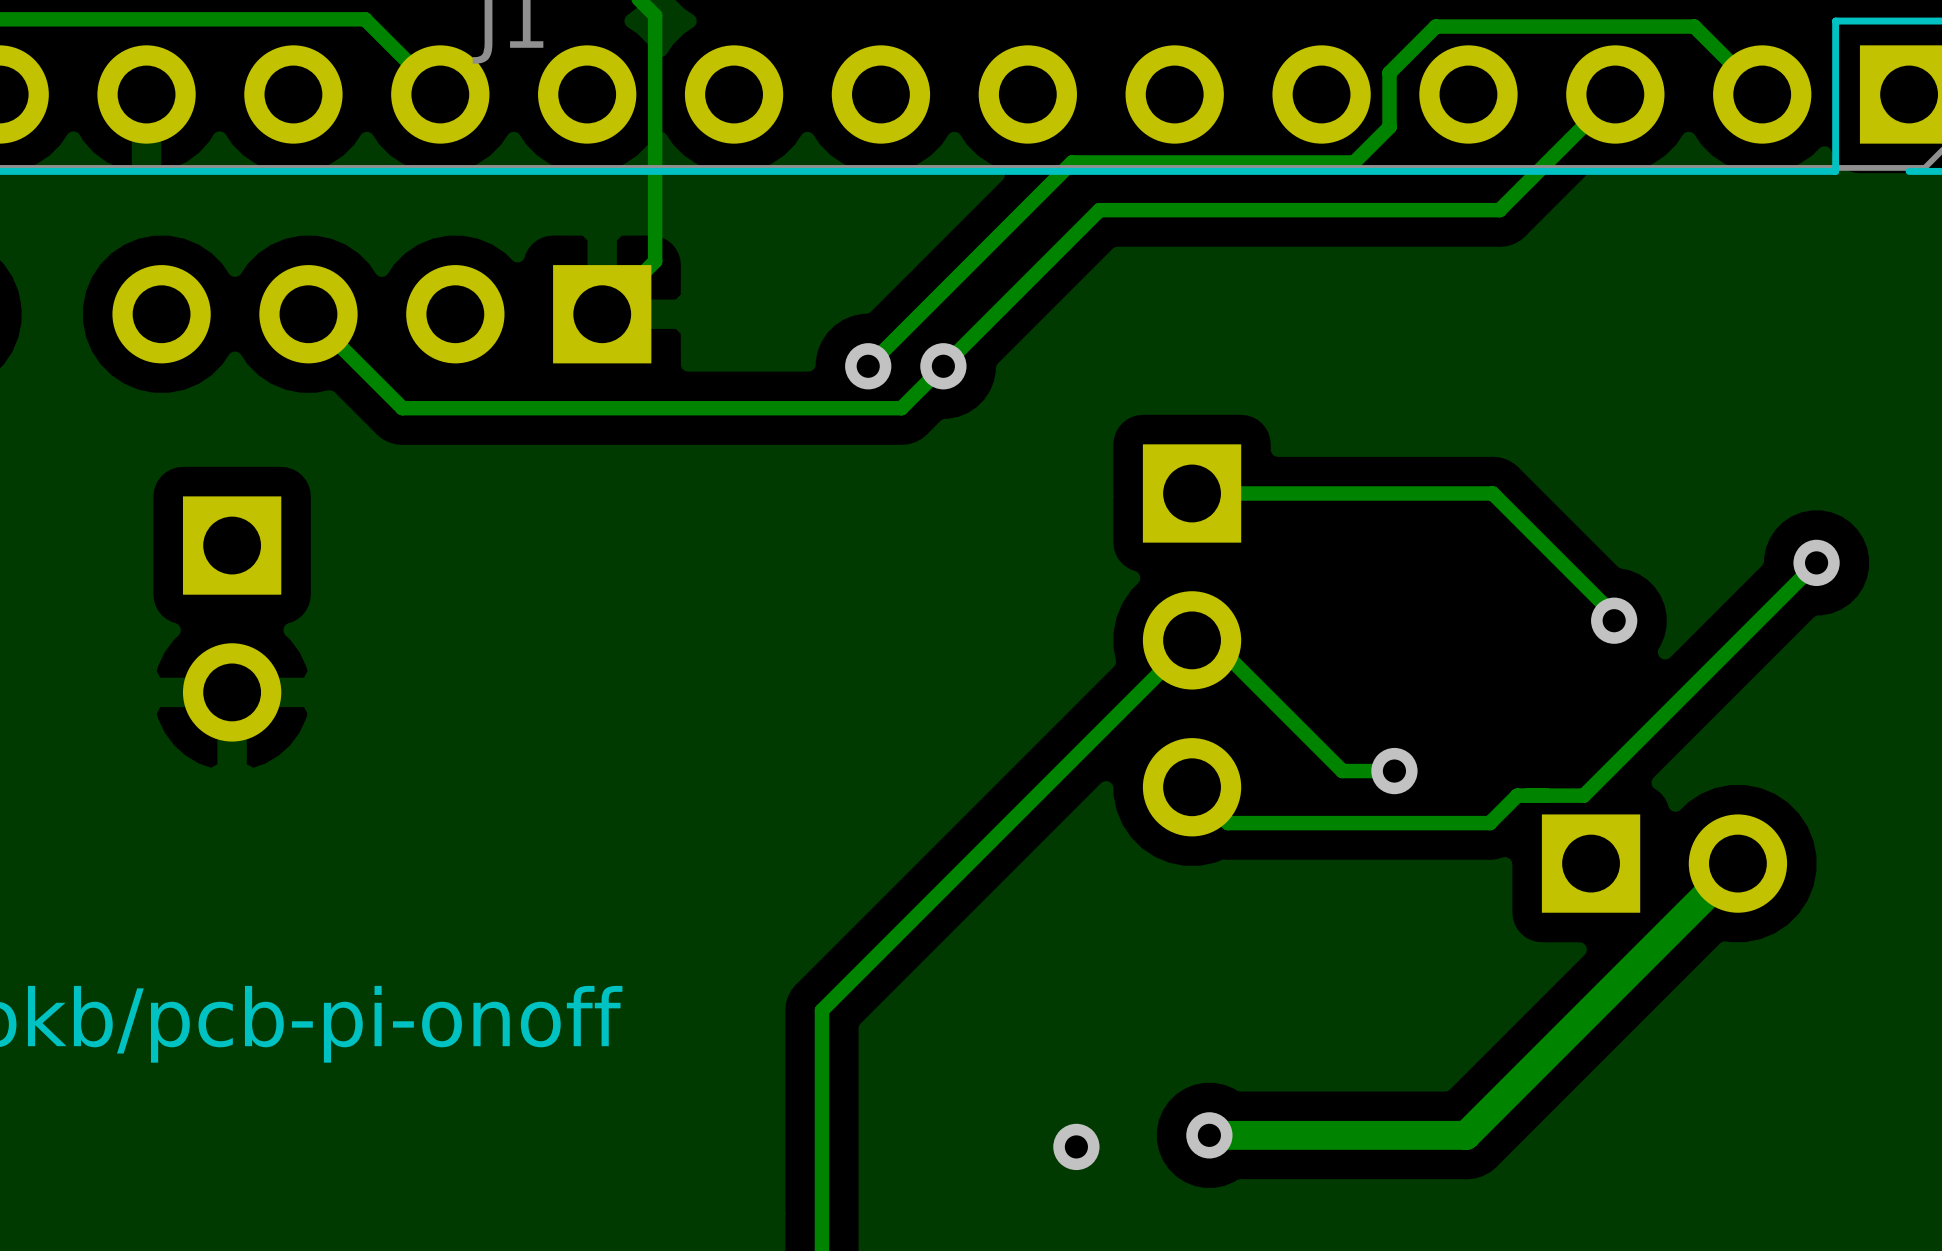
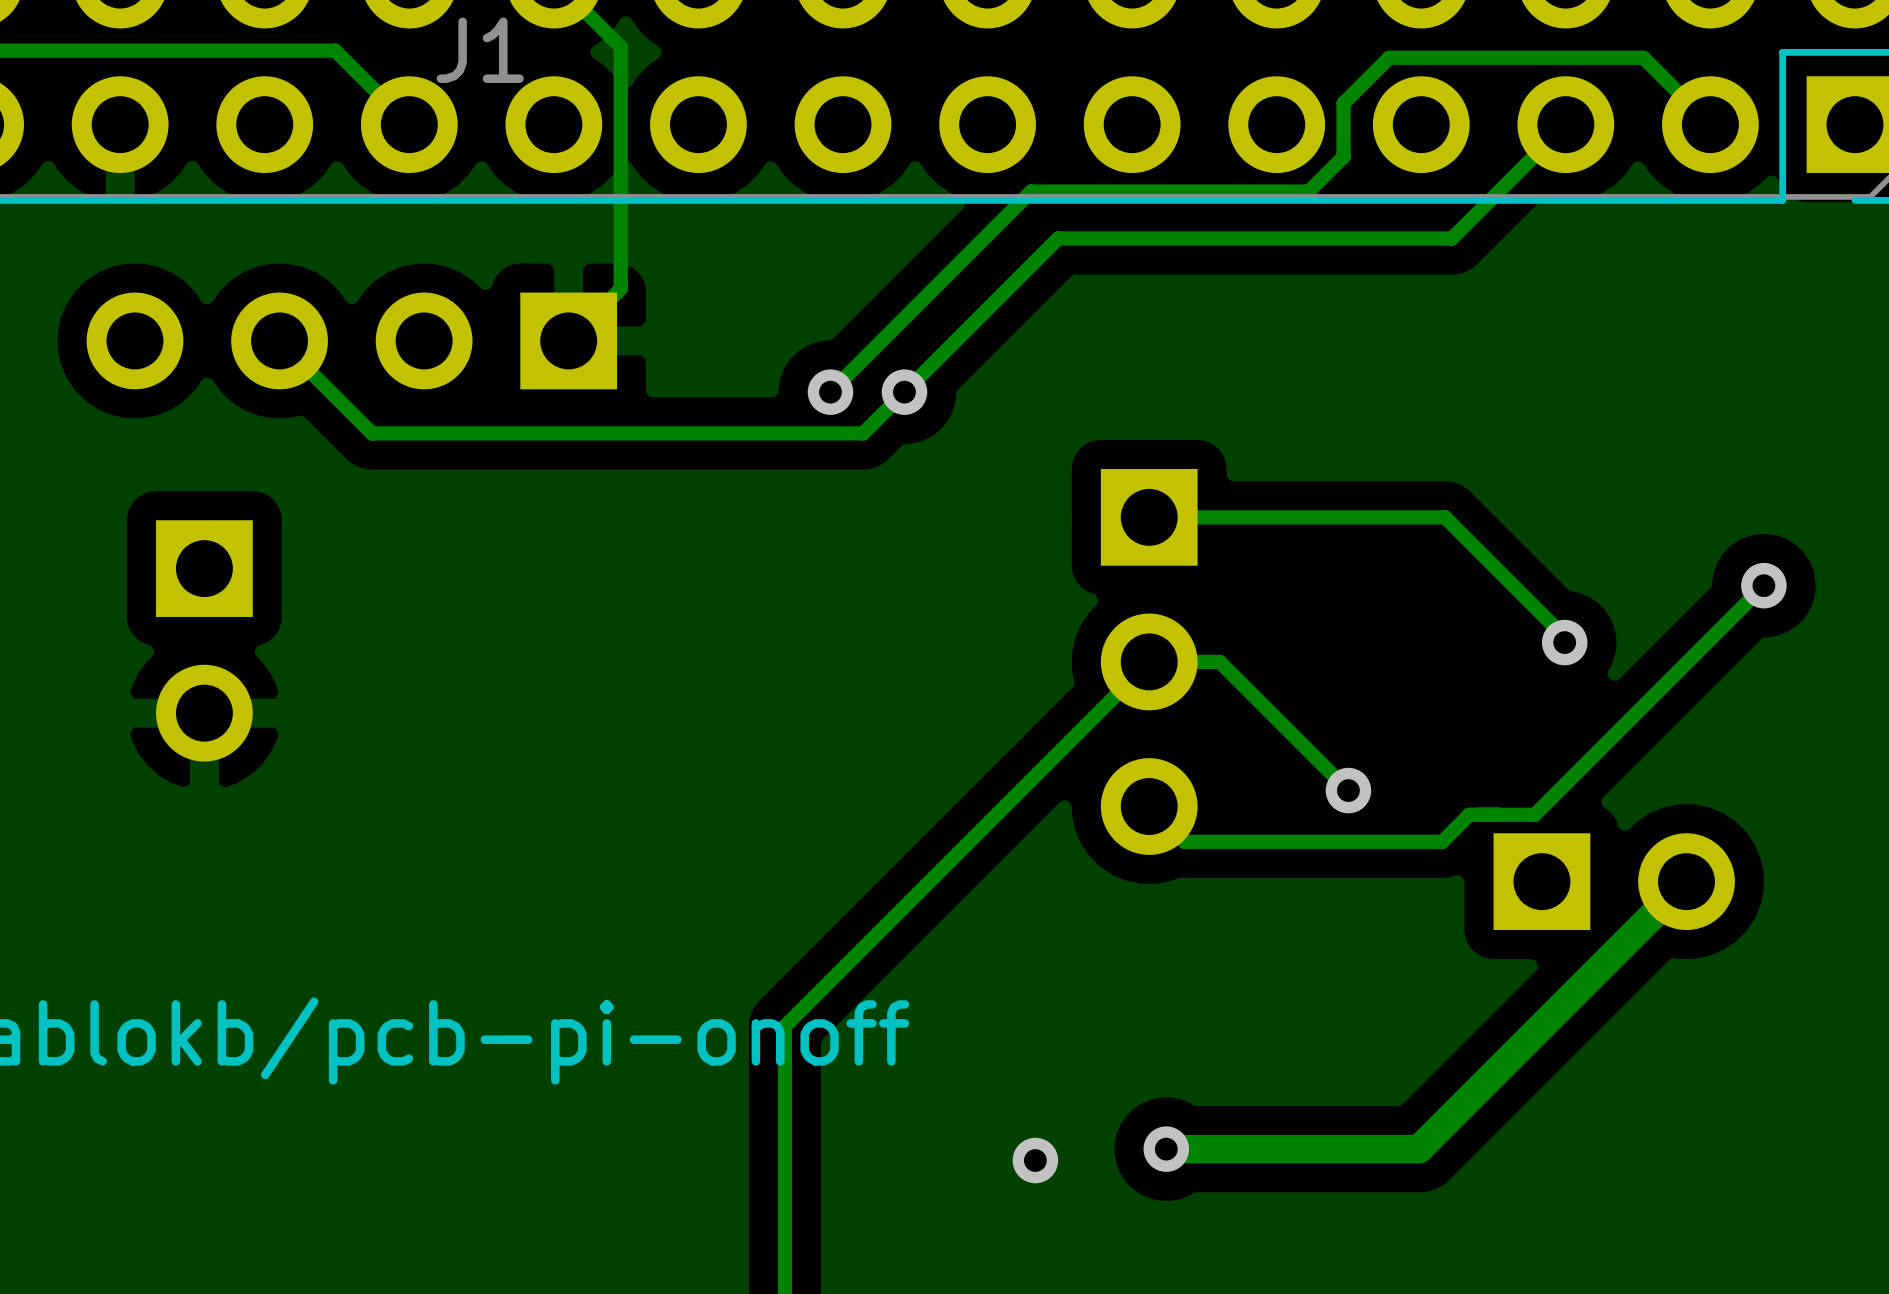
track: (1211, 640) (1342, 771) (1394, 771) -> (1168, 661) (1219, 661) (1348, 790)

